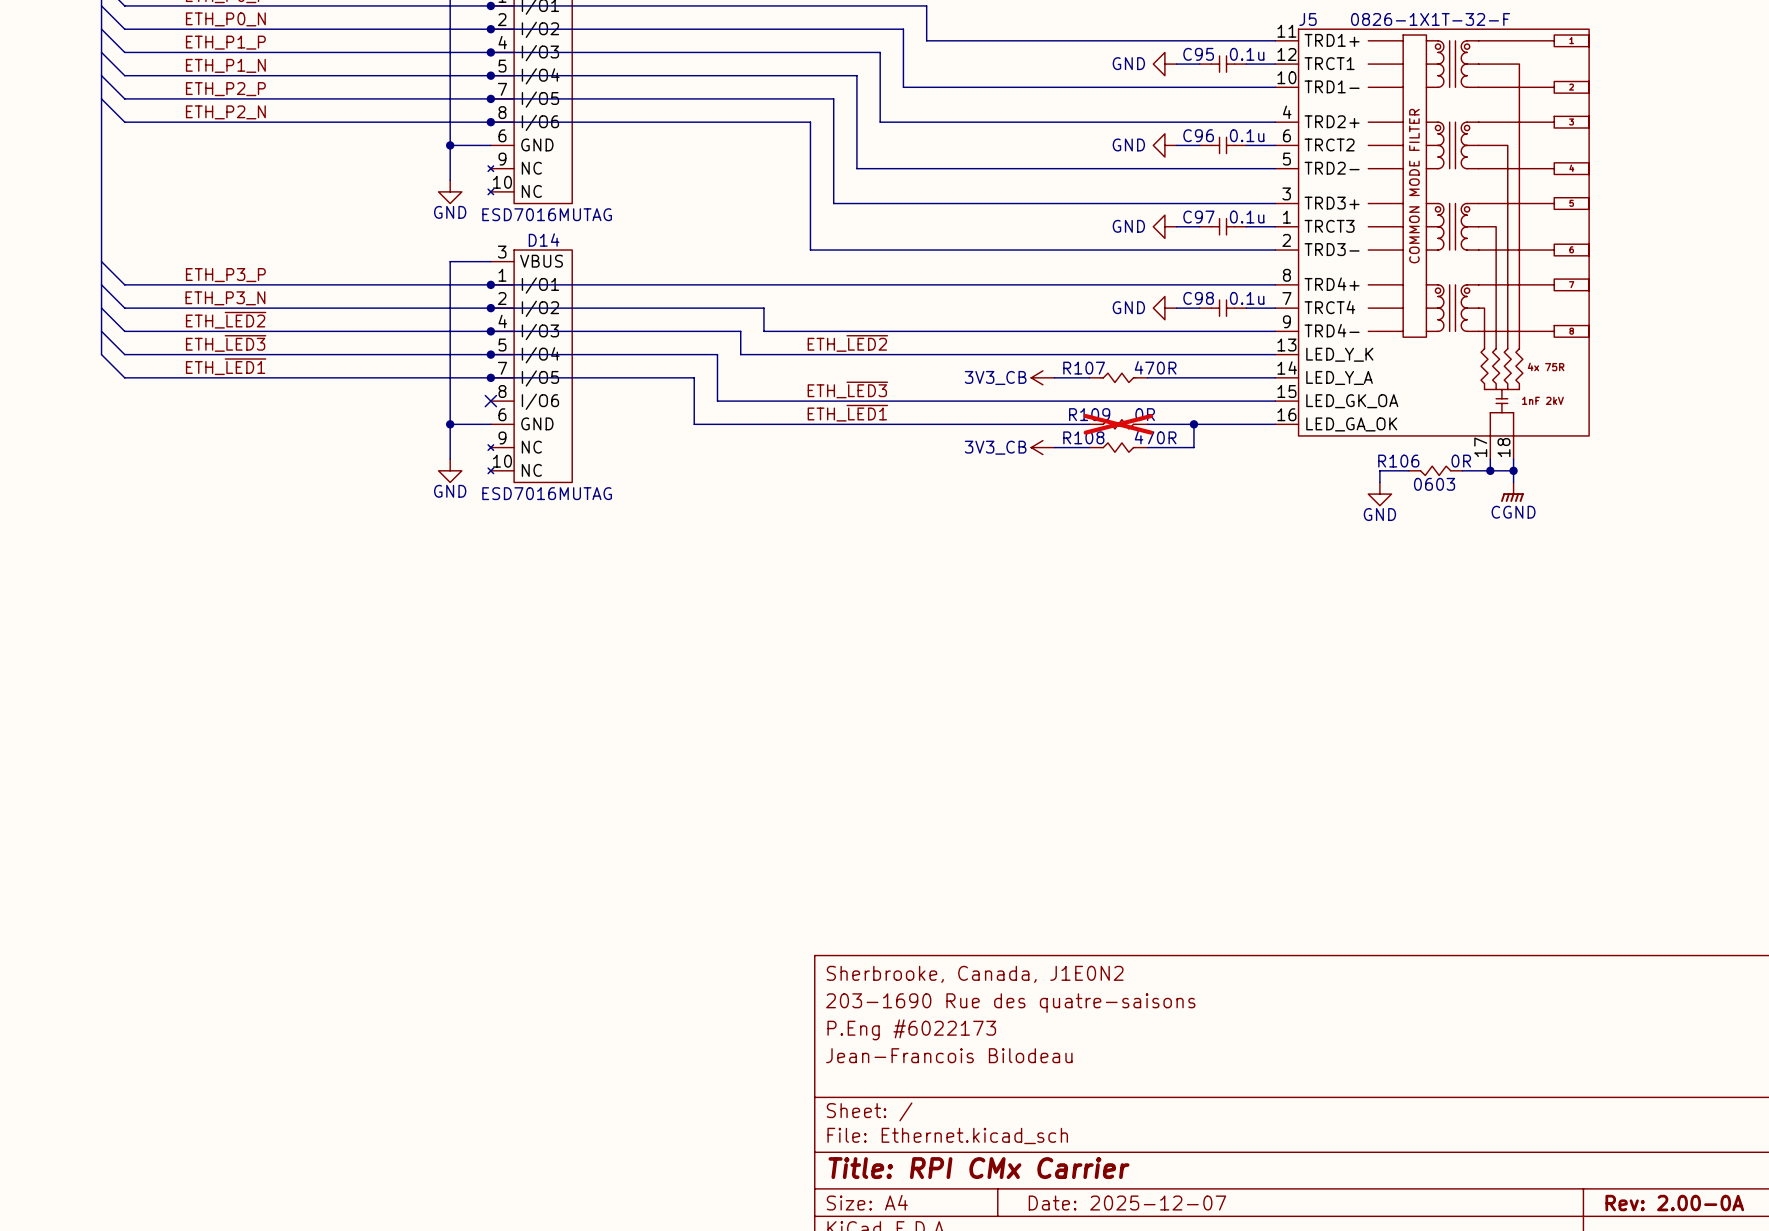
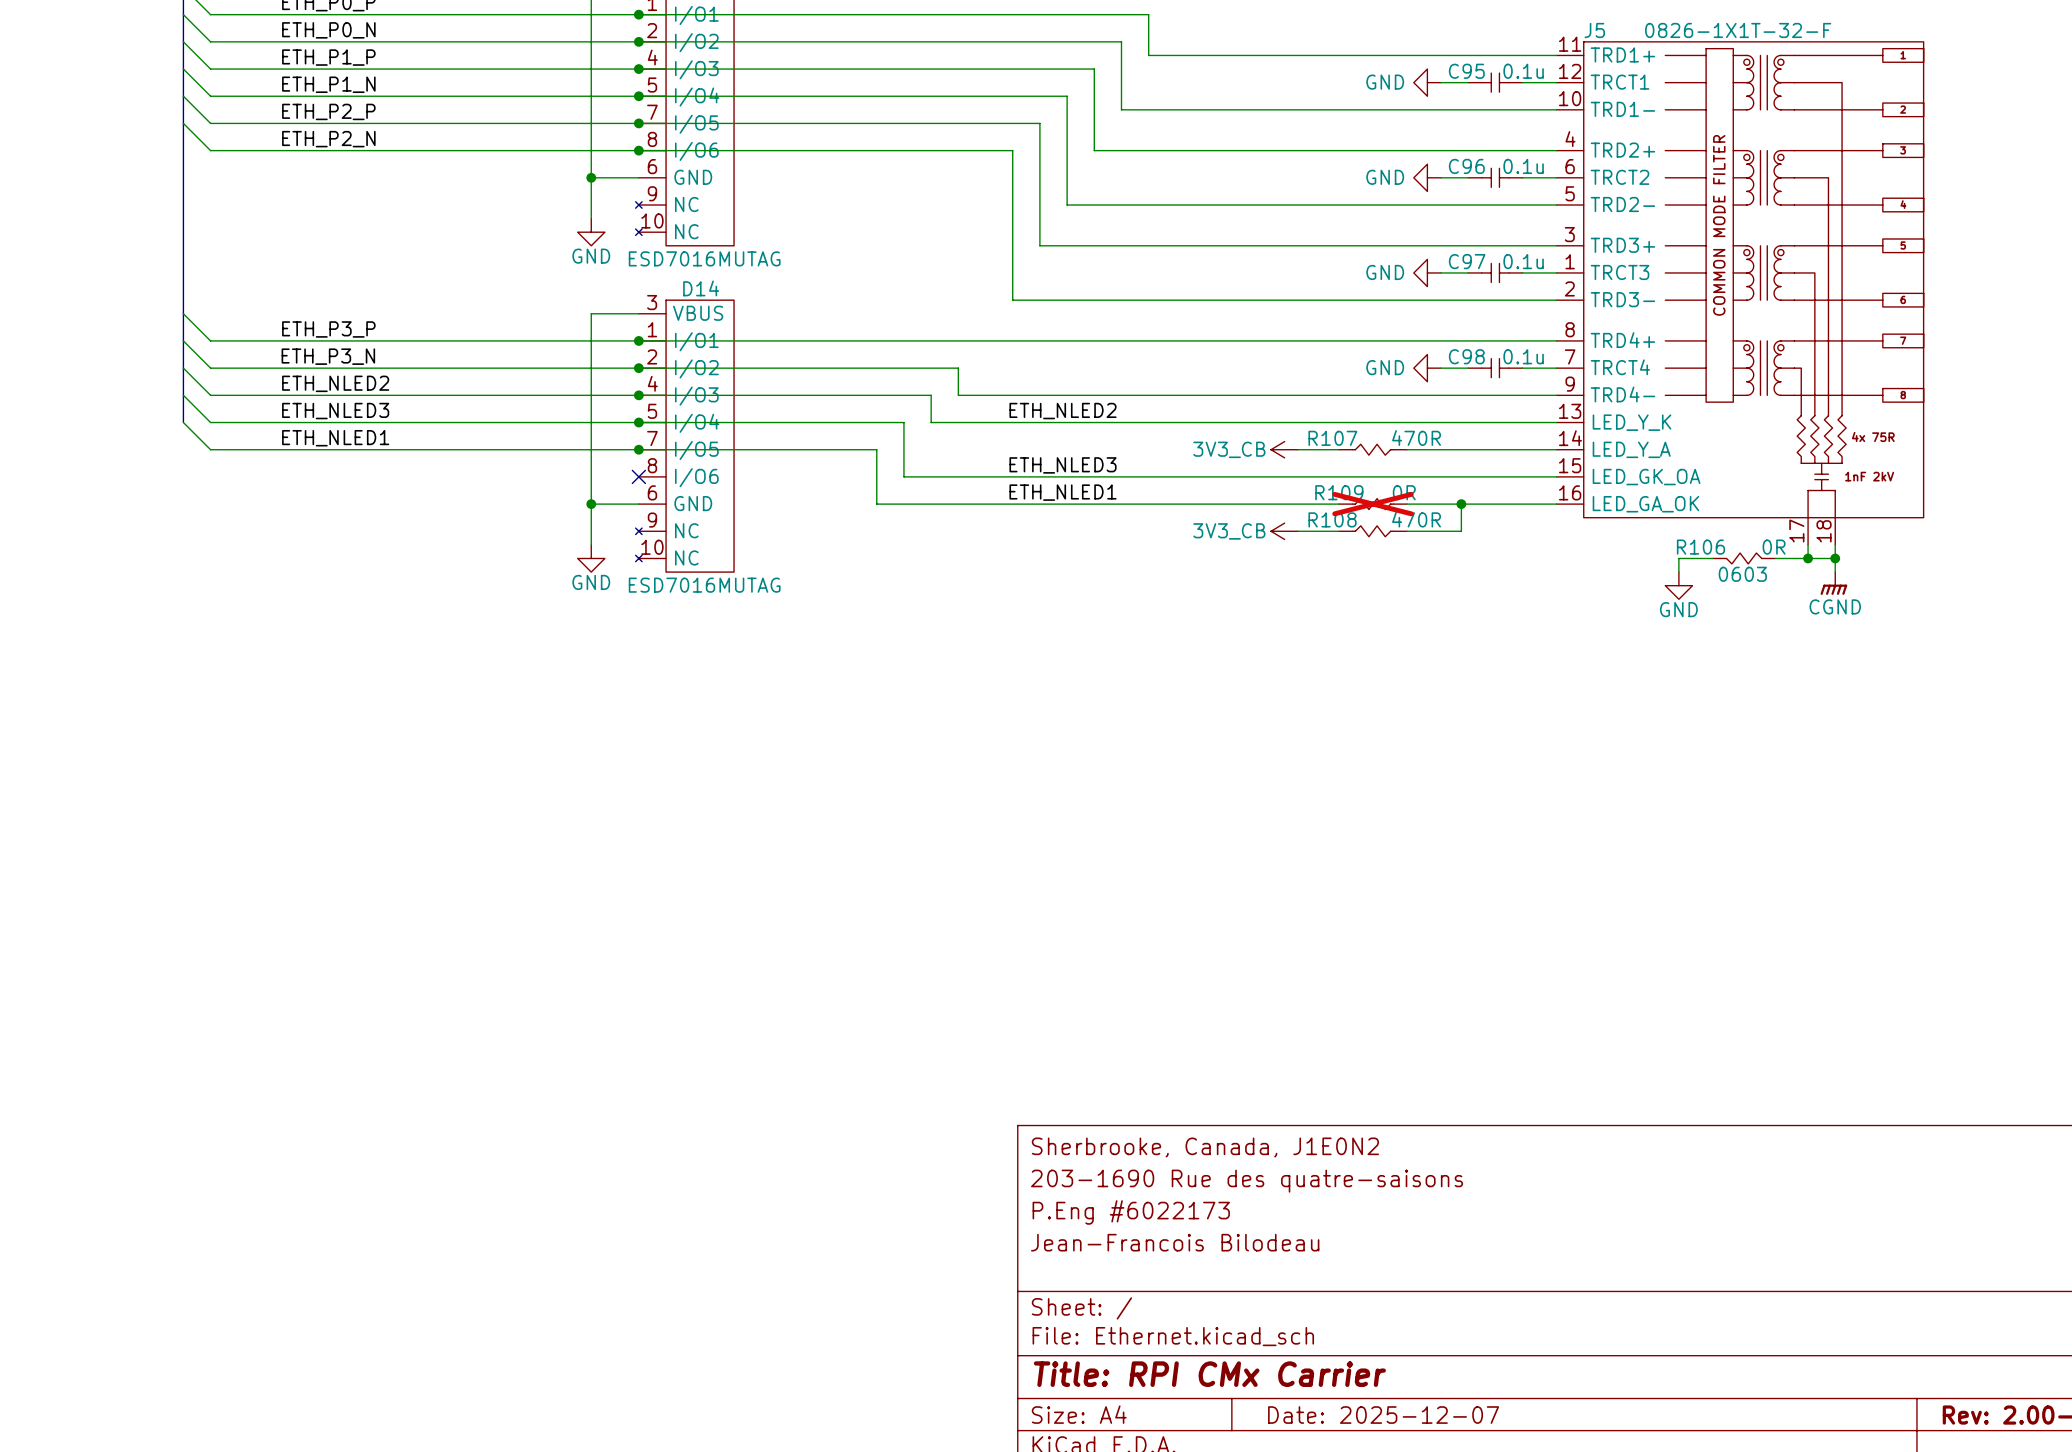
label: ETH_~{LED2} (226, 320) -> ETH_NLED2 (335, 383)
label: ETH_~{LED3} (226, 343) -> ETH_NLED3 (335, 411)
label: ETH_~{LED2} (847, 343) -> ETH_NLED2 (1063, 411)
label: ETH_~{LED1} (226, 366) -> ETH_NLED1 (335, 438)
label: ETH_~{LED3} (847, 389) -> ETH_NLED3 (1063, 465)
label: ETH_~{LED1} (847, 413) -> ETH_NLED1 (1063, 492)

